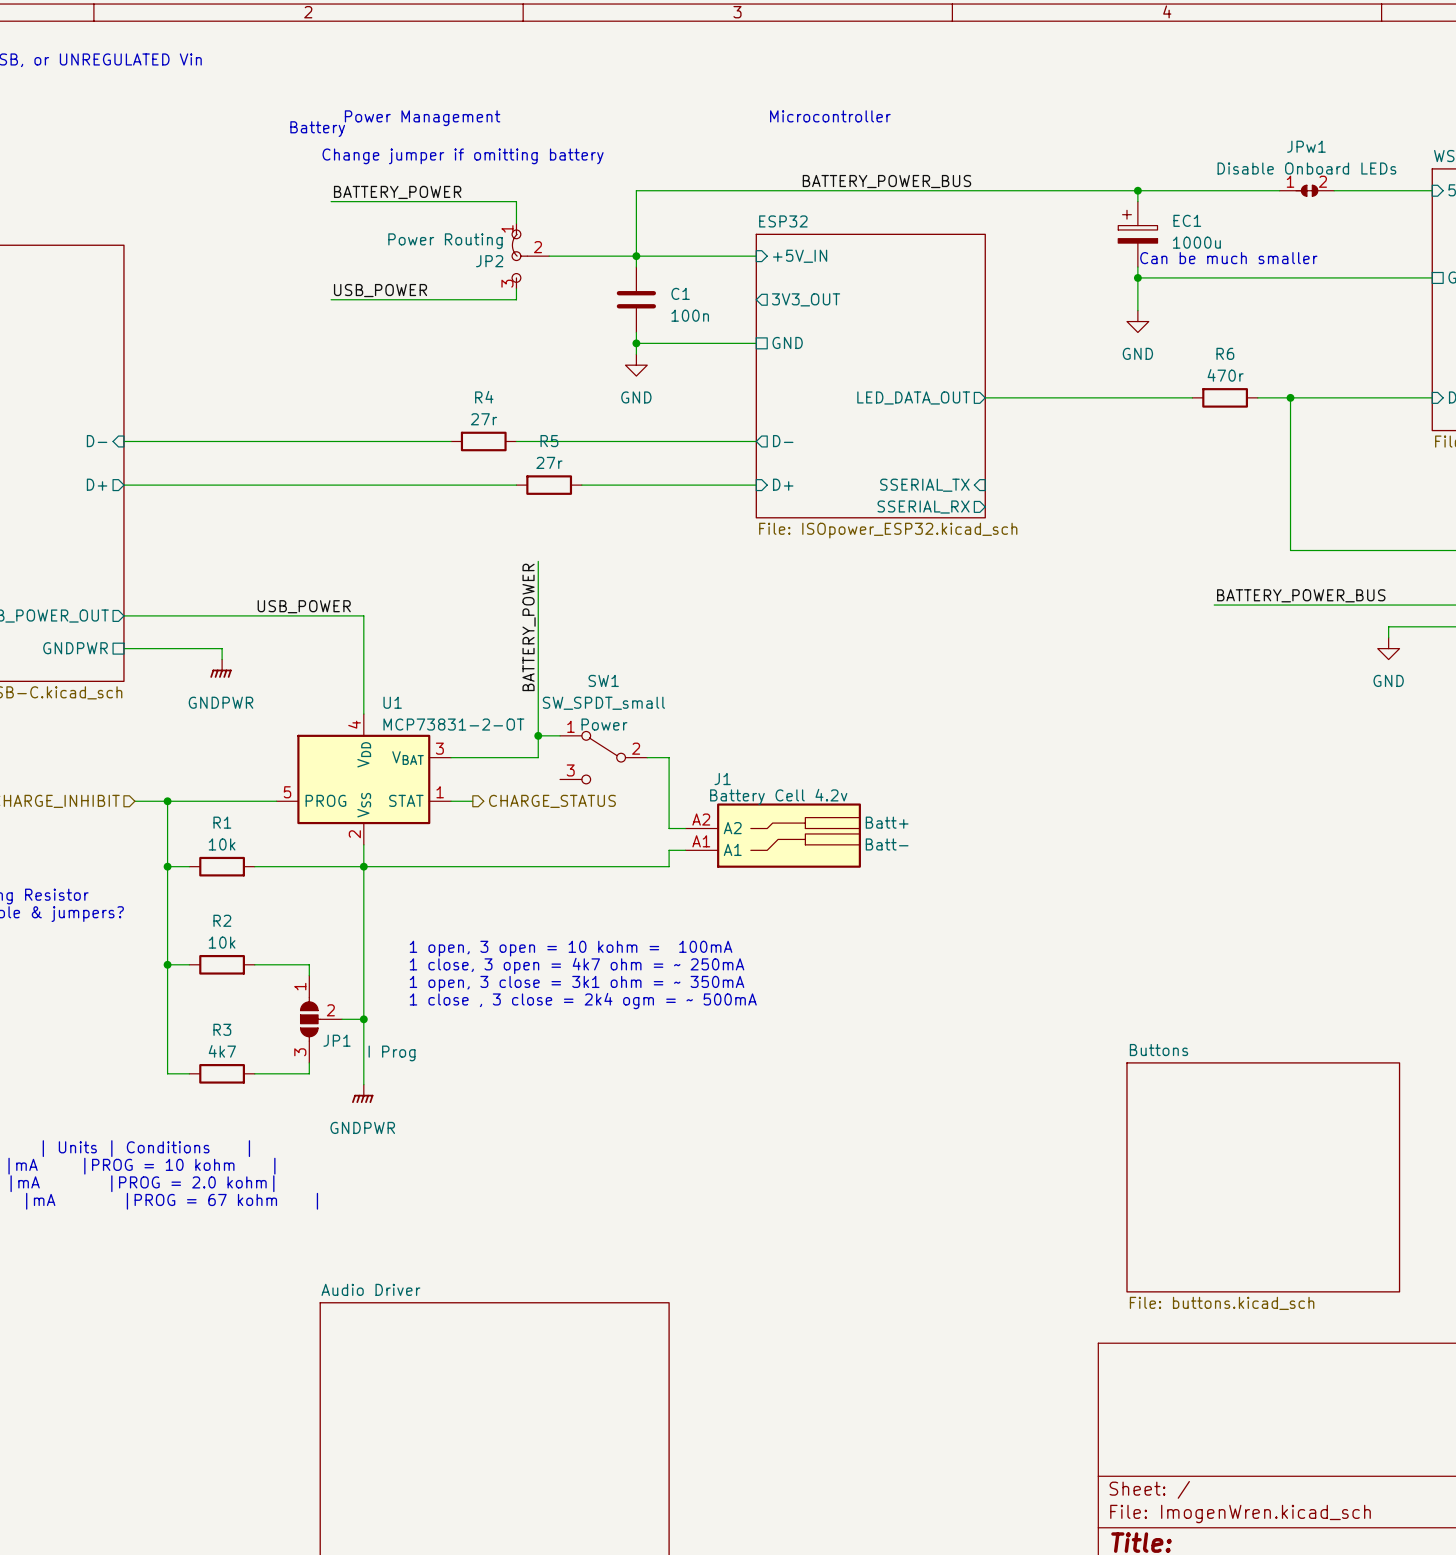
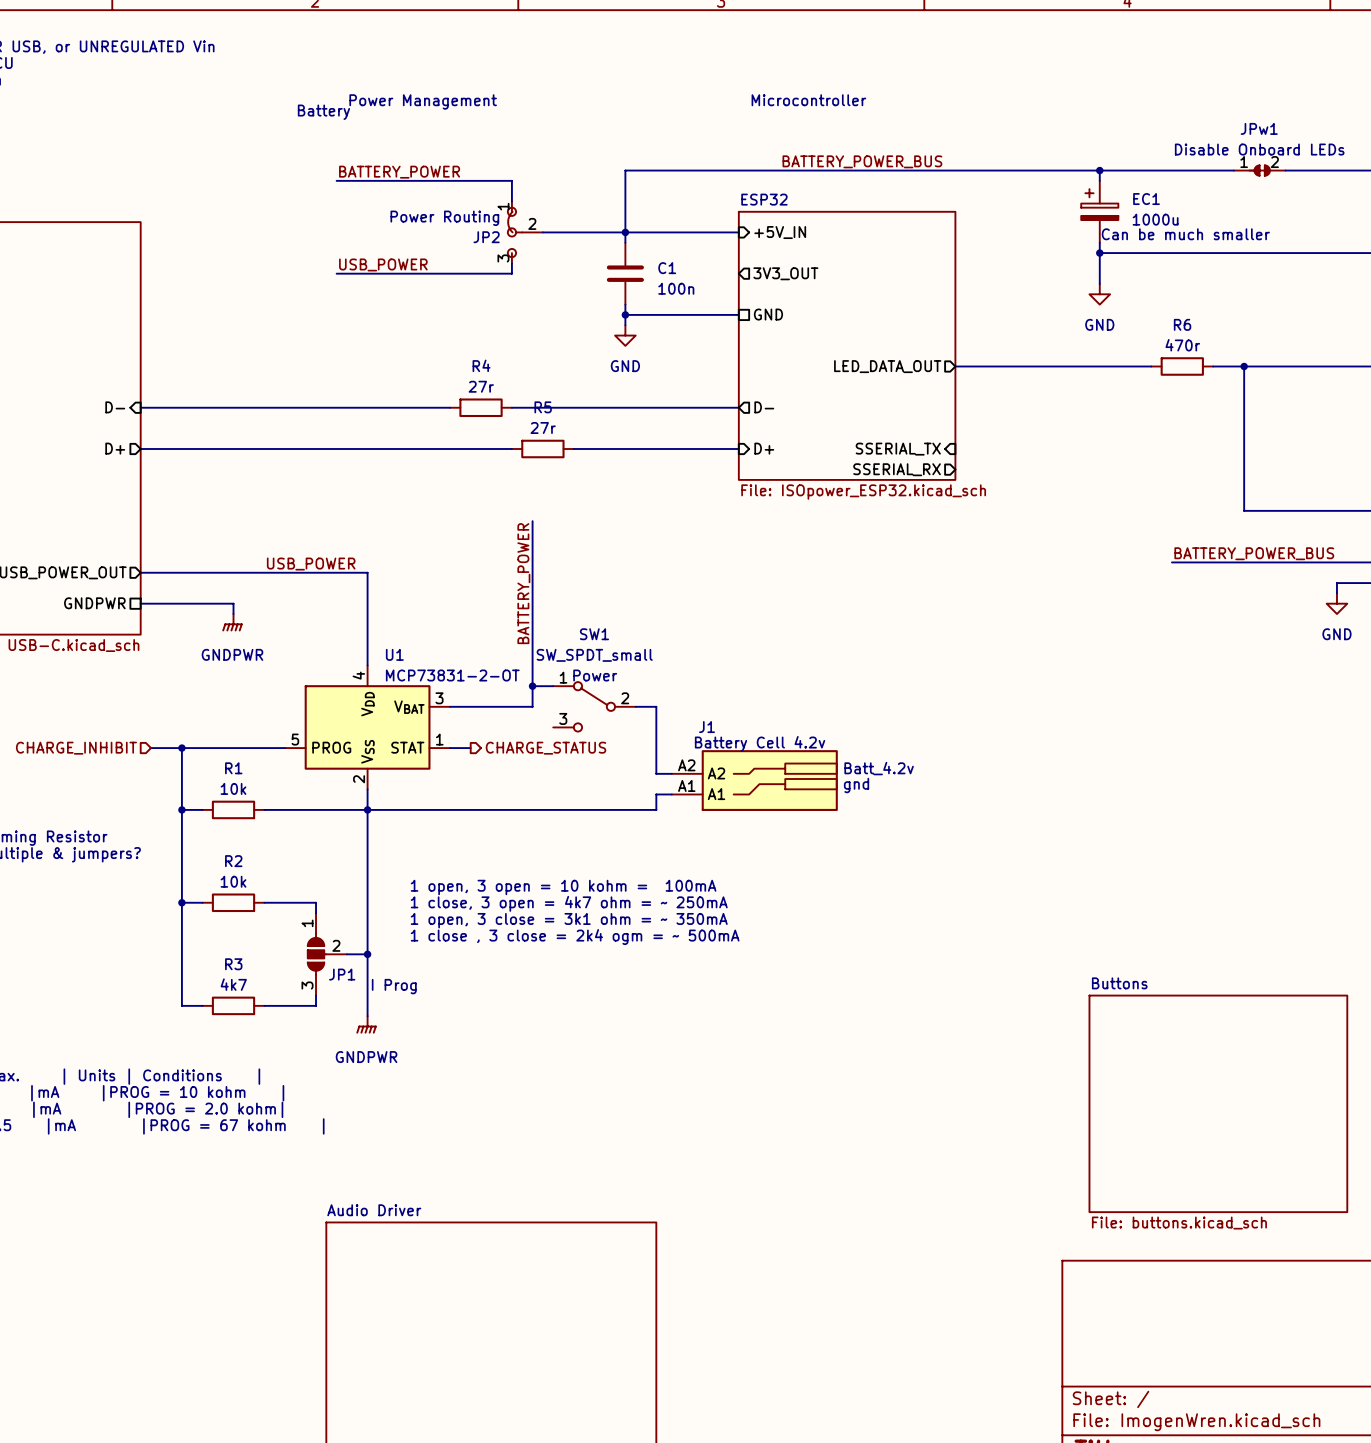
text: Change jumper if omitting battery (463, 156) -> none
J1 text: Batt+ (887, 822) -> Batt_4.2v (879, 768)
J1 text: Batt- (887, 844) -> gnd (856, 785)

